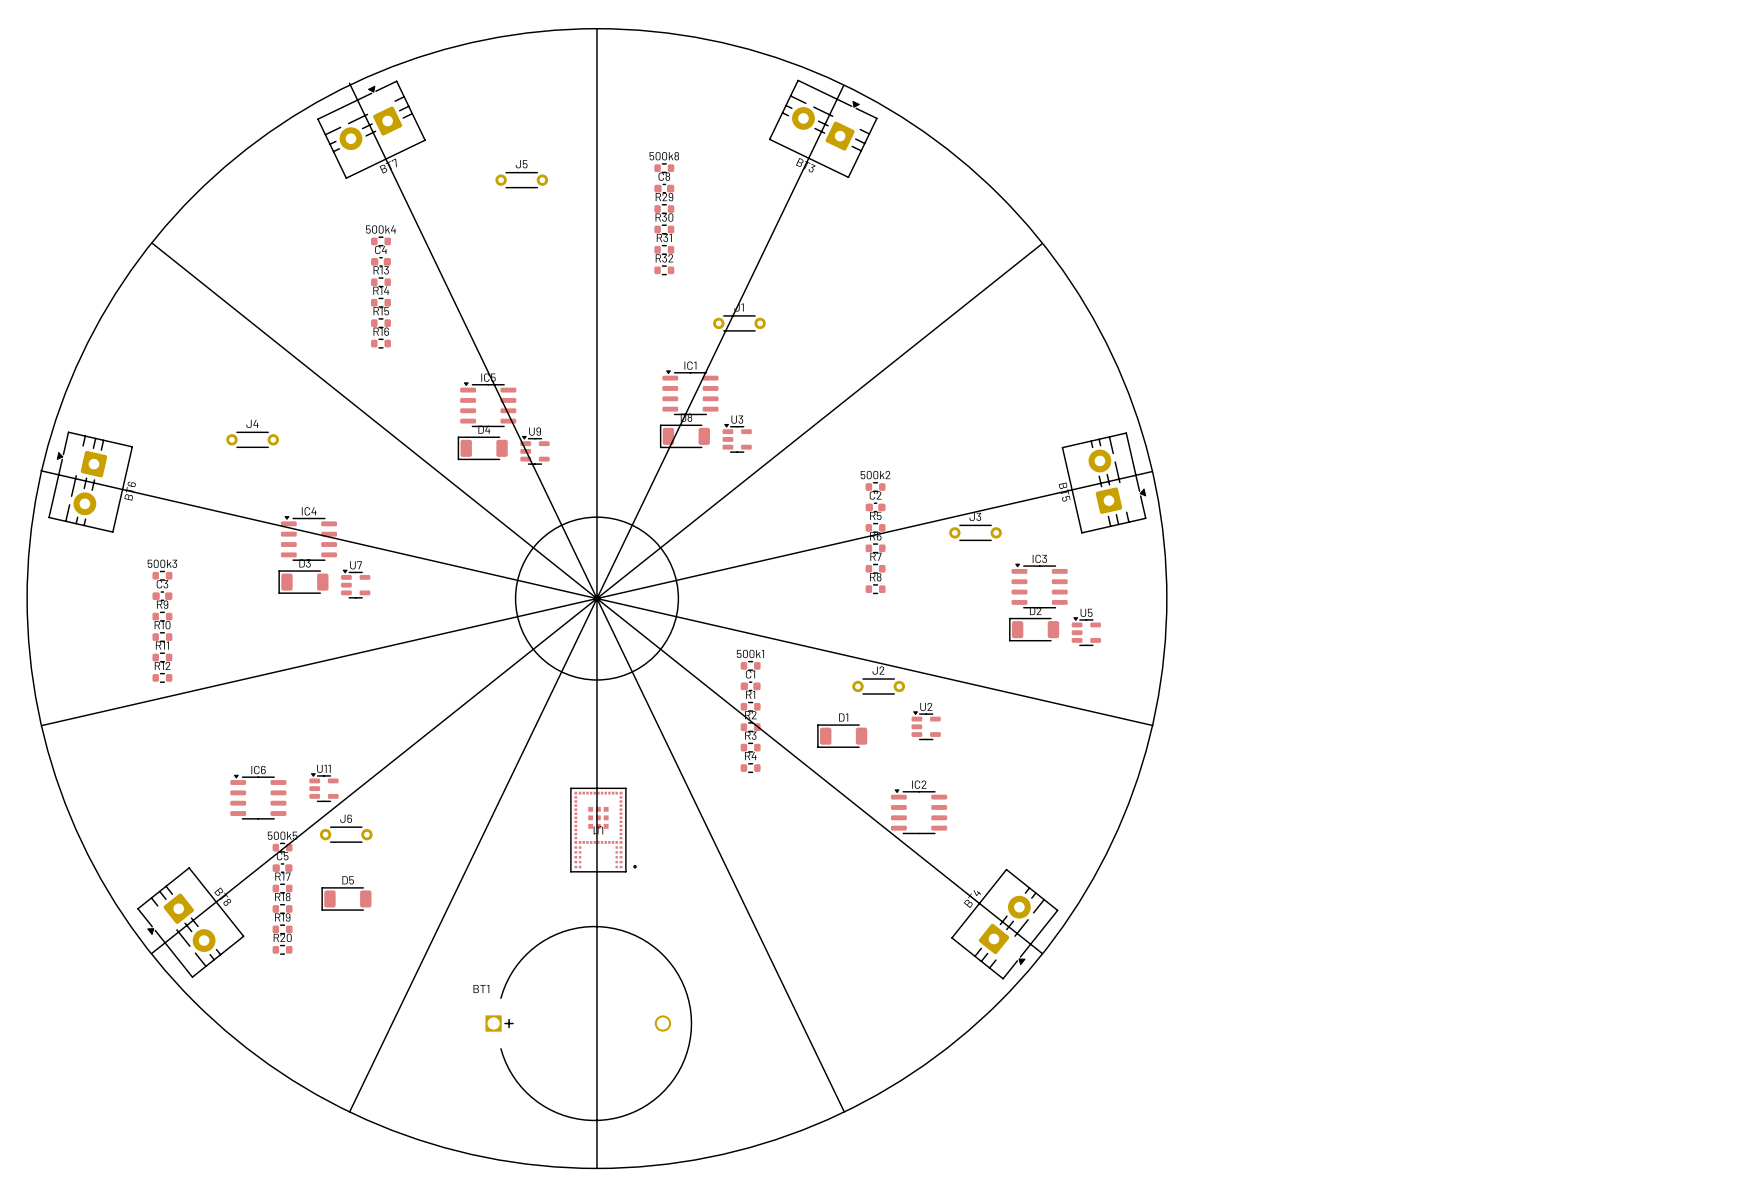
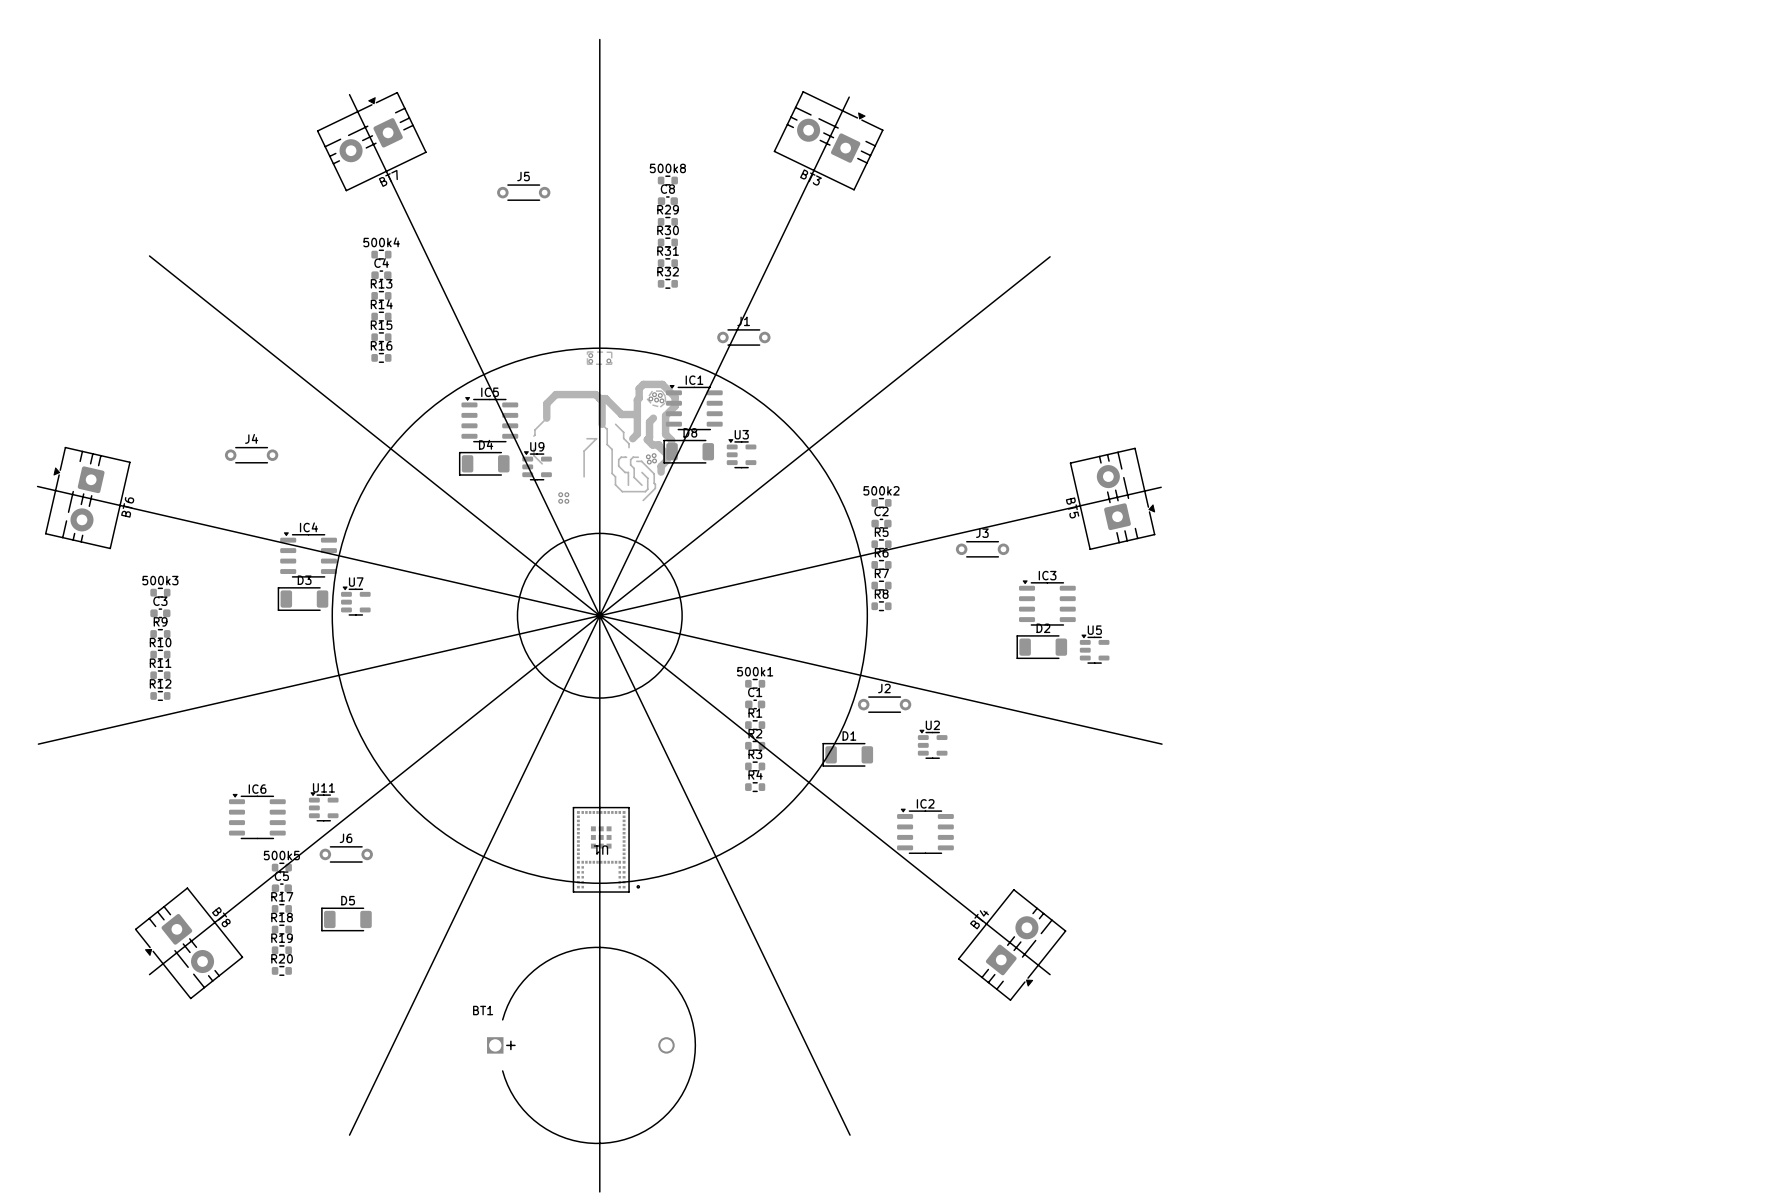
round board edge size: [26, 28, 1168, 1169] -> [332, 347, 868, 884]
zone outline: none -> (587, 351) (611, 352) (611, 364) (587, 364) (587, 351)
via: none -> (590, 355)
via: none -> (608, 360)
via: none -> (590, 361)
zone outline: none -> (652, 391) (647, 398) (652, 404) (660, 407) (665, 402) (665, 396) (661, 391) (652, 391)
via: none -> (654, 394)
via: none -> (660, 395)
track: none -> (599, 398) (605, 398) (621, 414) (637, 414)
via: none -> (650, 398)
via: none -> (656, 400)
via: none -> (661, 400)
track: none -> (653, 418) (649, 422) (649, 437) (647, 439) (652, 444) (658, 444) (666, 454) (666, 460) (661, 466) (661, 472)
track: none -> (615, 424) (623, 432) (623, 438) (629, 443) (629, 447)
track: none -> (533, 436) (534, 429) (546, 418) (546, 403) (555, 394) (595, 394) (602, 400) (602, 424) (607, 428) (607, 444) (612, 449) (612, 473) (615, 476) (615, 484) (622, 491) (645, 491) (647, 489) (647, 478) (641, 472)
track: none -> (587, 438) (596, 438) (584, 451) (584, 476)
track: none -> (632, 438) (637, 434) (639, 388) (643, 384) (662, 384) (675, 397) (675, 406) (665, 415) (665, 434) (671, 440) (671, 444)
track: none -> (533, 449) (533, 455) (542, 463)
via: none -> (654, 455)
track: none -> (626, 457) (621, 457) (618, 459) (618, 466) (625, 472) (628, 472) (628, 485)
track: none -> (638, 457) (633, 457) (630, 459) (630, 464) (634, 468) (634, 477) (641, 485)
via: none -> (648, 456)
track: none -> (636, 461) (641, 461) (654, 473) (655, 488) (643, 500)
via: none -> (654, 460)
via: none -> (649, 462)
via: none -> (560, 494)
via: none -> (566, 494)
via: none -> (560, 501)
via: none -> (566, 501)

